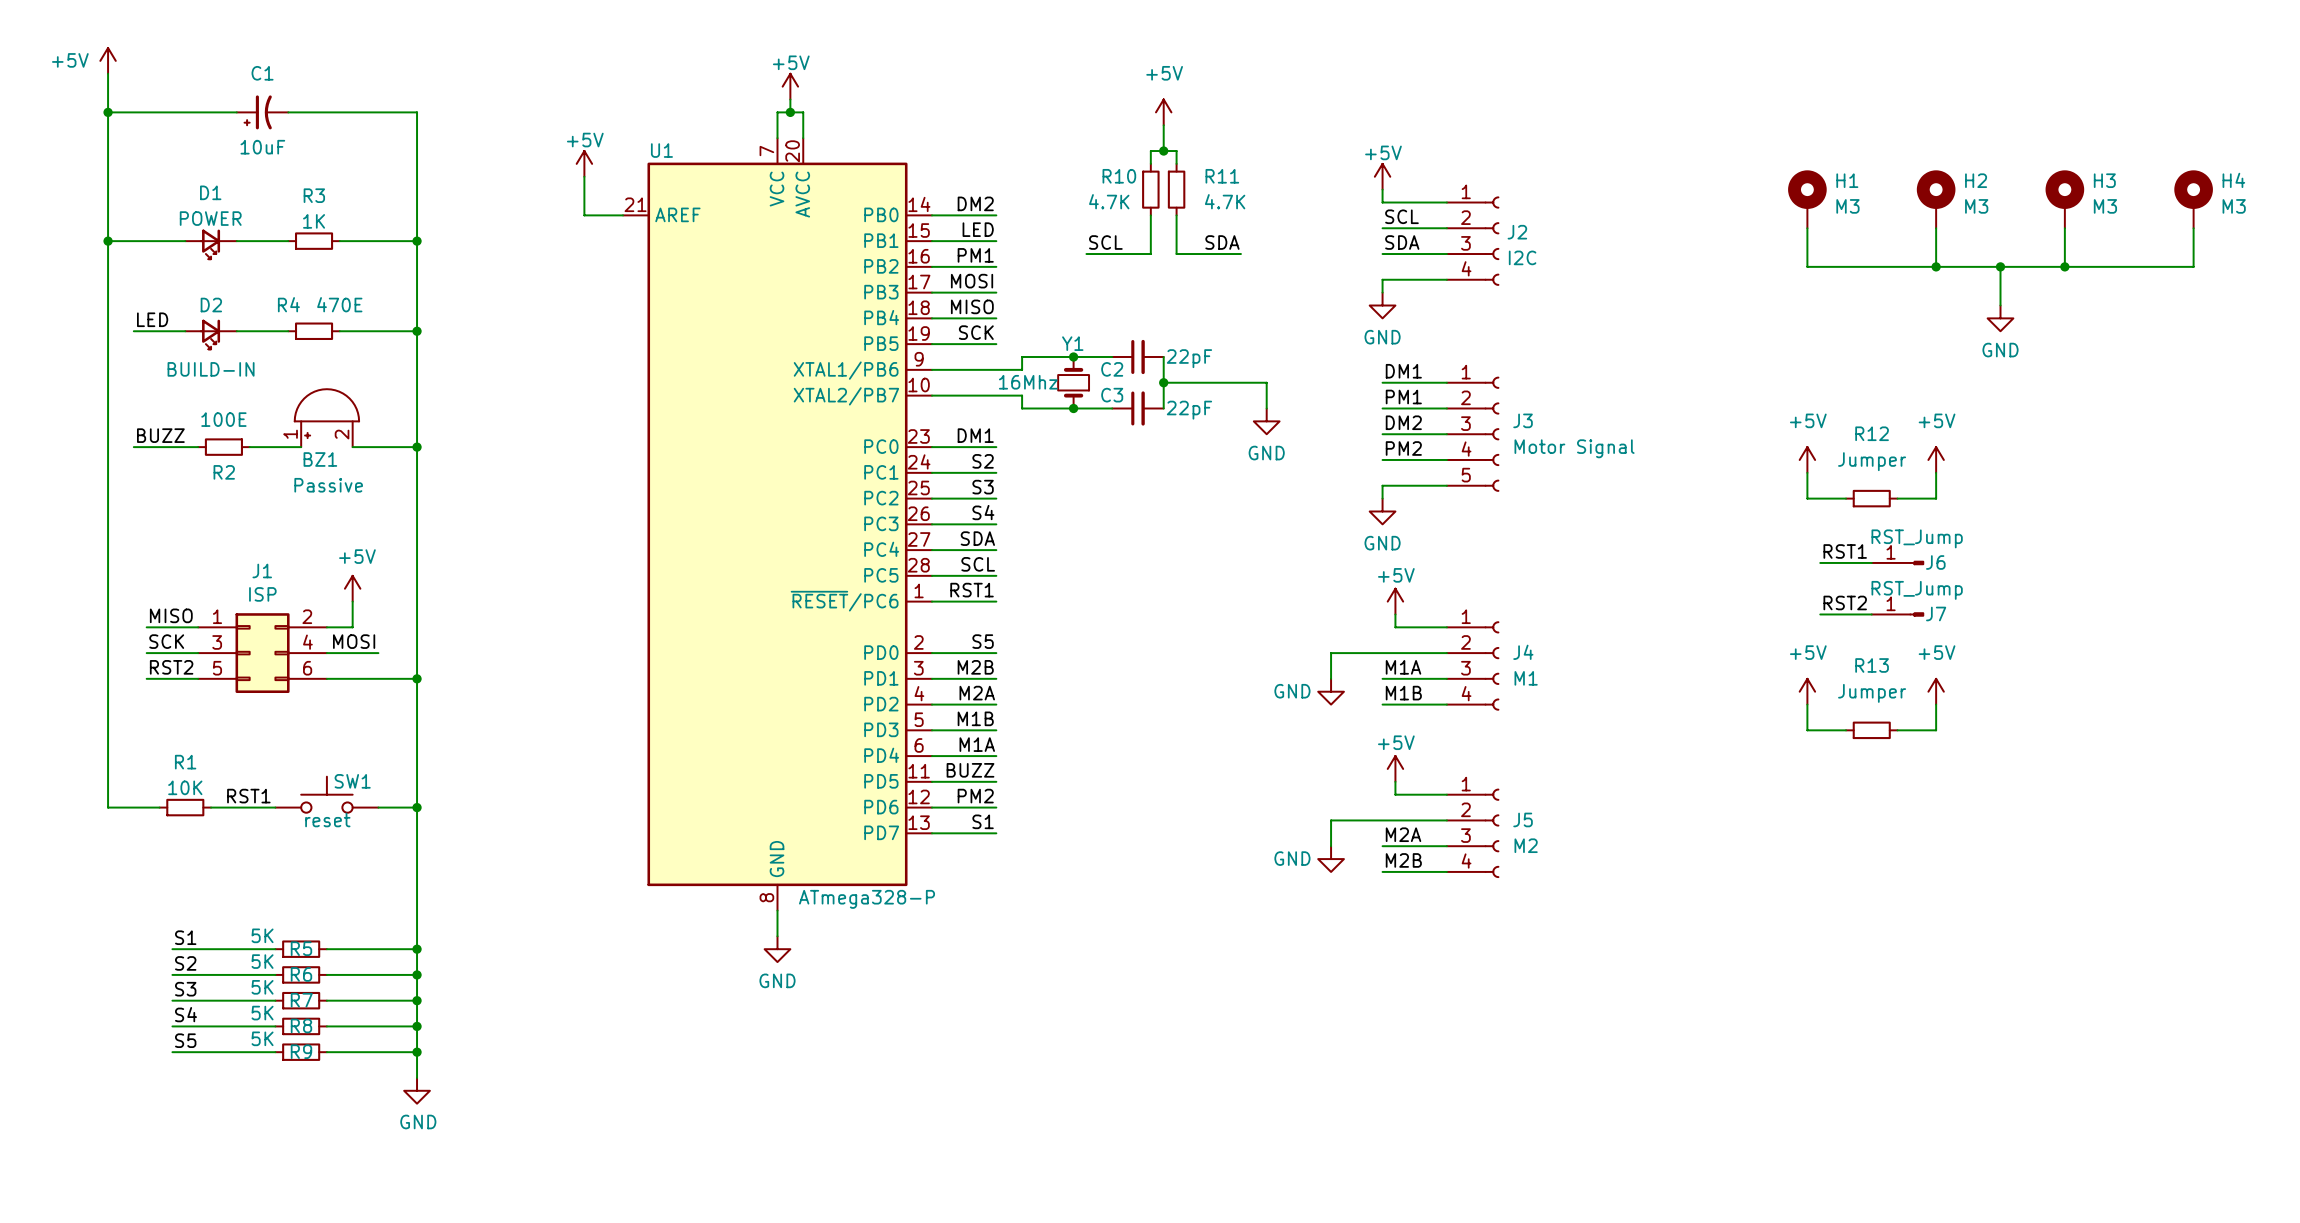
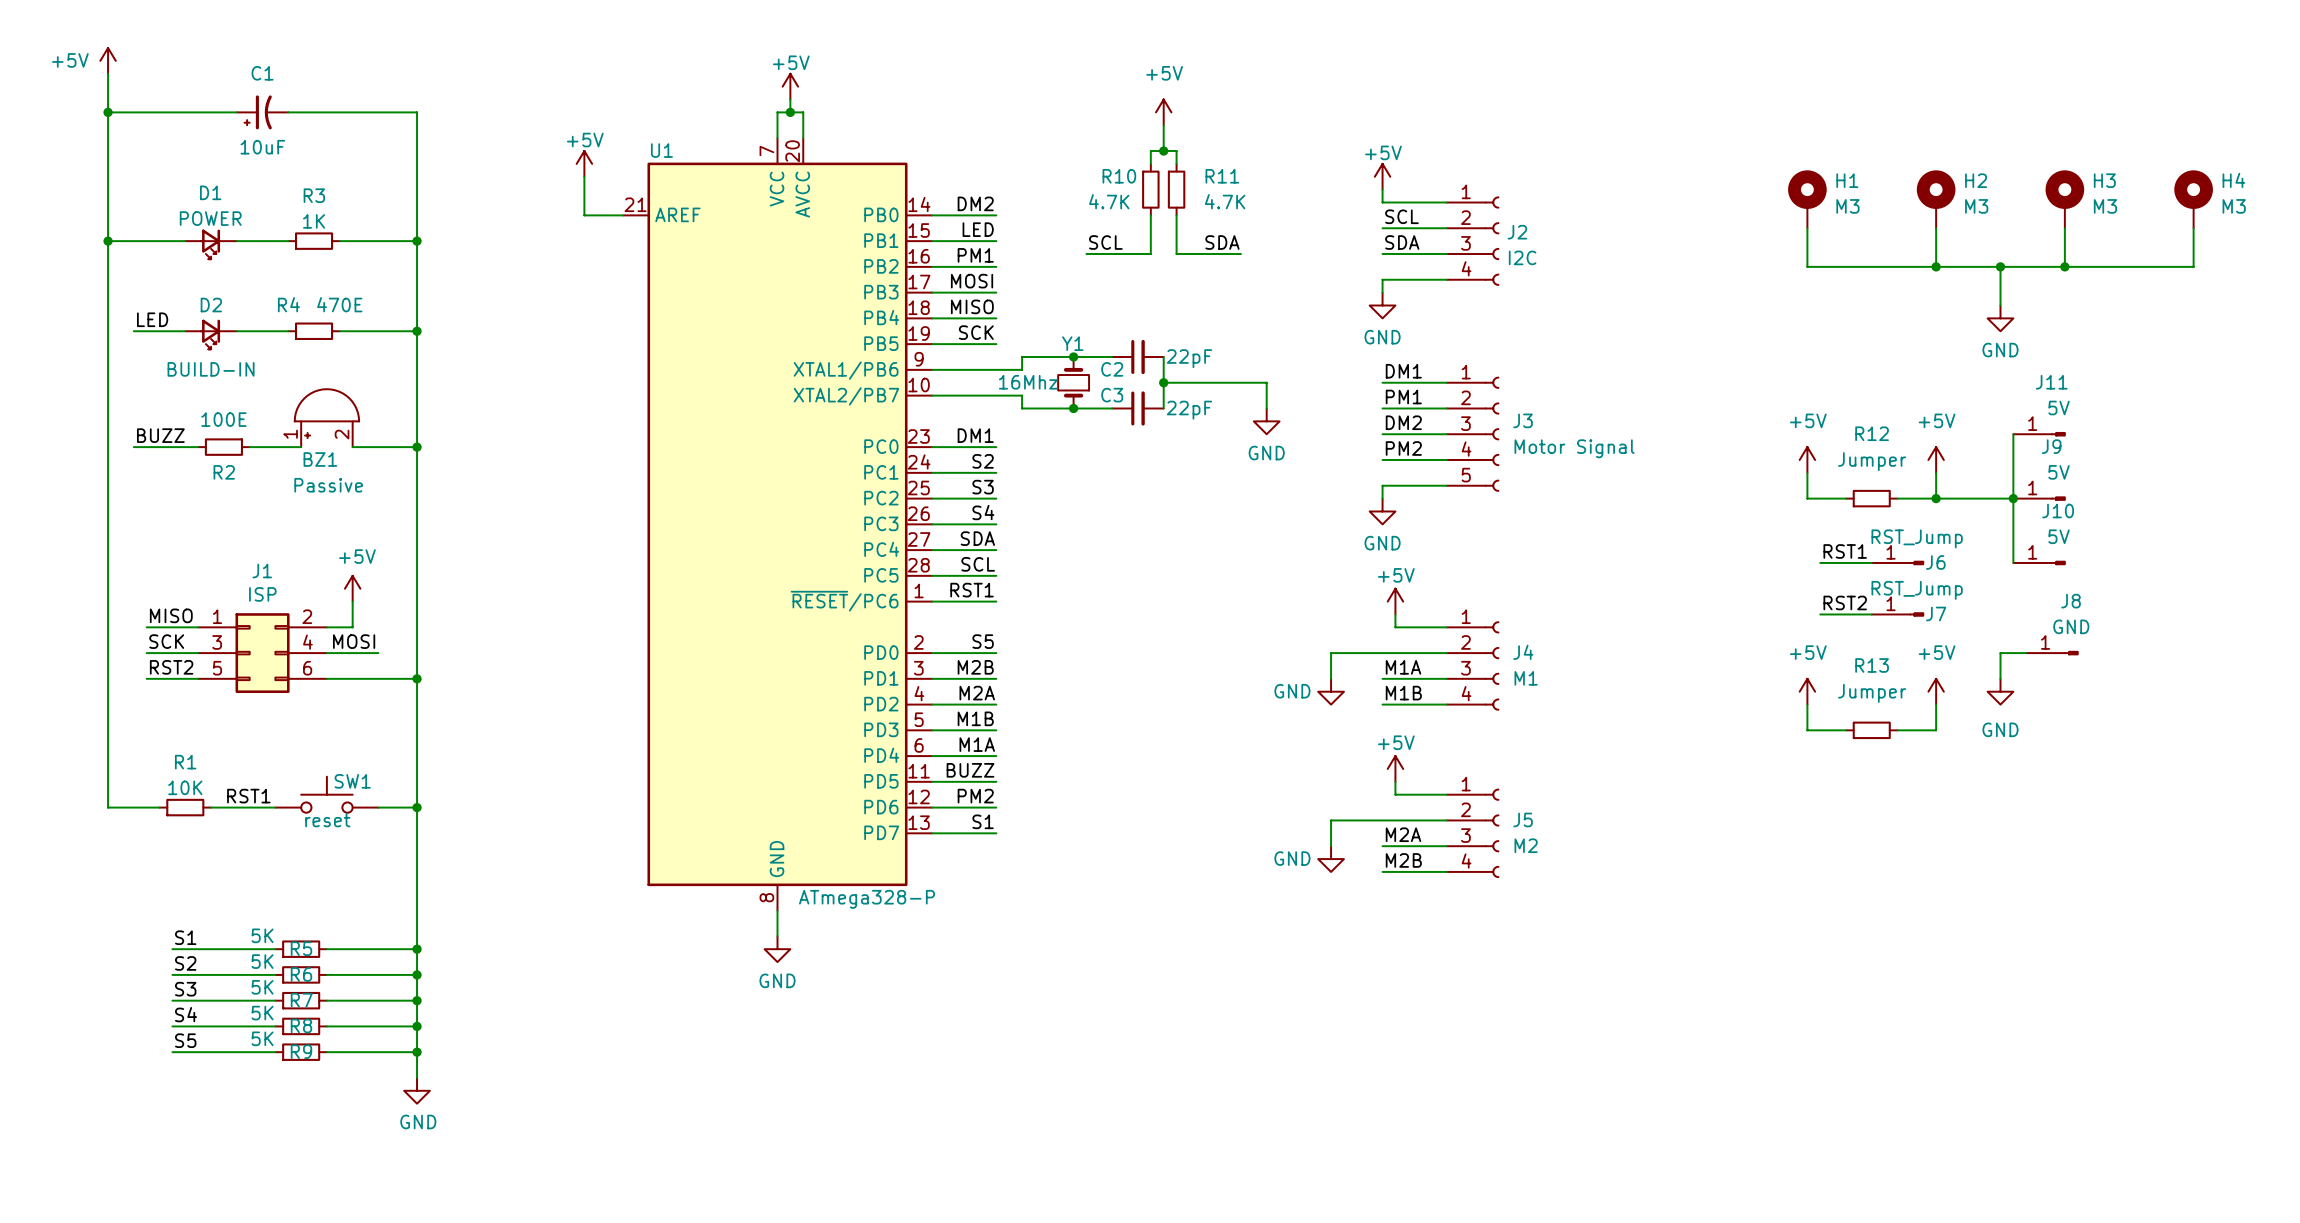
wire: none -> (2013, 434) (2013, 562)
J11: none -> 5V (2039, 434)
wire: none -> (1936, 498) (2013, 498)
junction: none -> (1936, 498)
junction: none -> (2013, 498)
J9: none -> 5V (2039, 498)
J10: none -> 5V (2039, 562)
wire: none -> (2026, 653) (2000, 653) (2000, 678)
J8: none -> GND (2052, 653)
power symbol: none -> GND (2000, 691)

